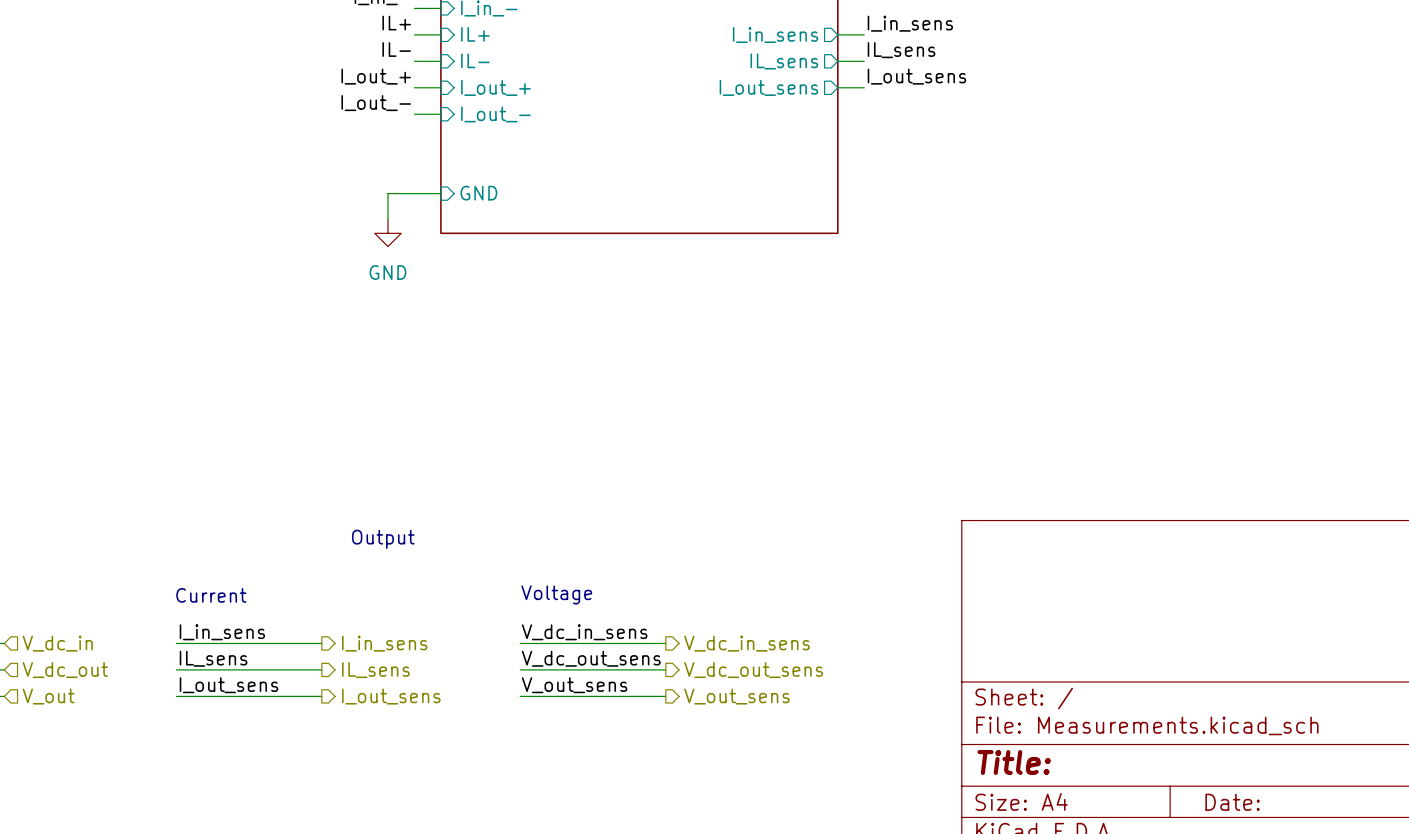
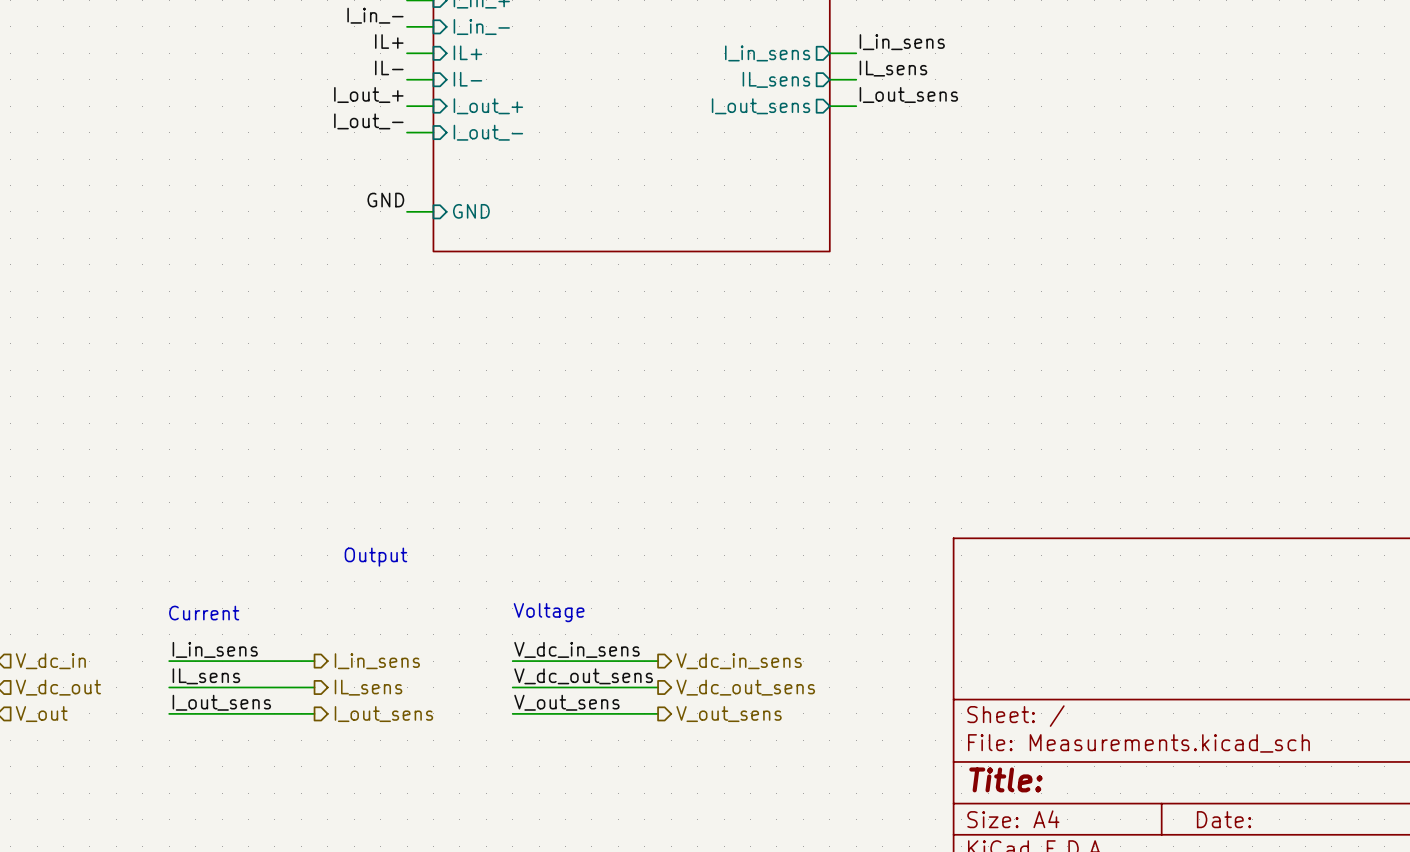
label: none -> GND (385, 200)
wire: (414, 193) (387, 193) (387, 220) -> none
power symbol: GND (387, 233) -> none

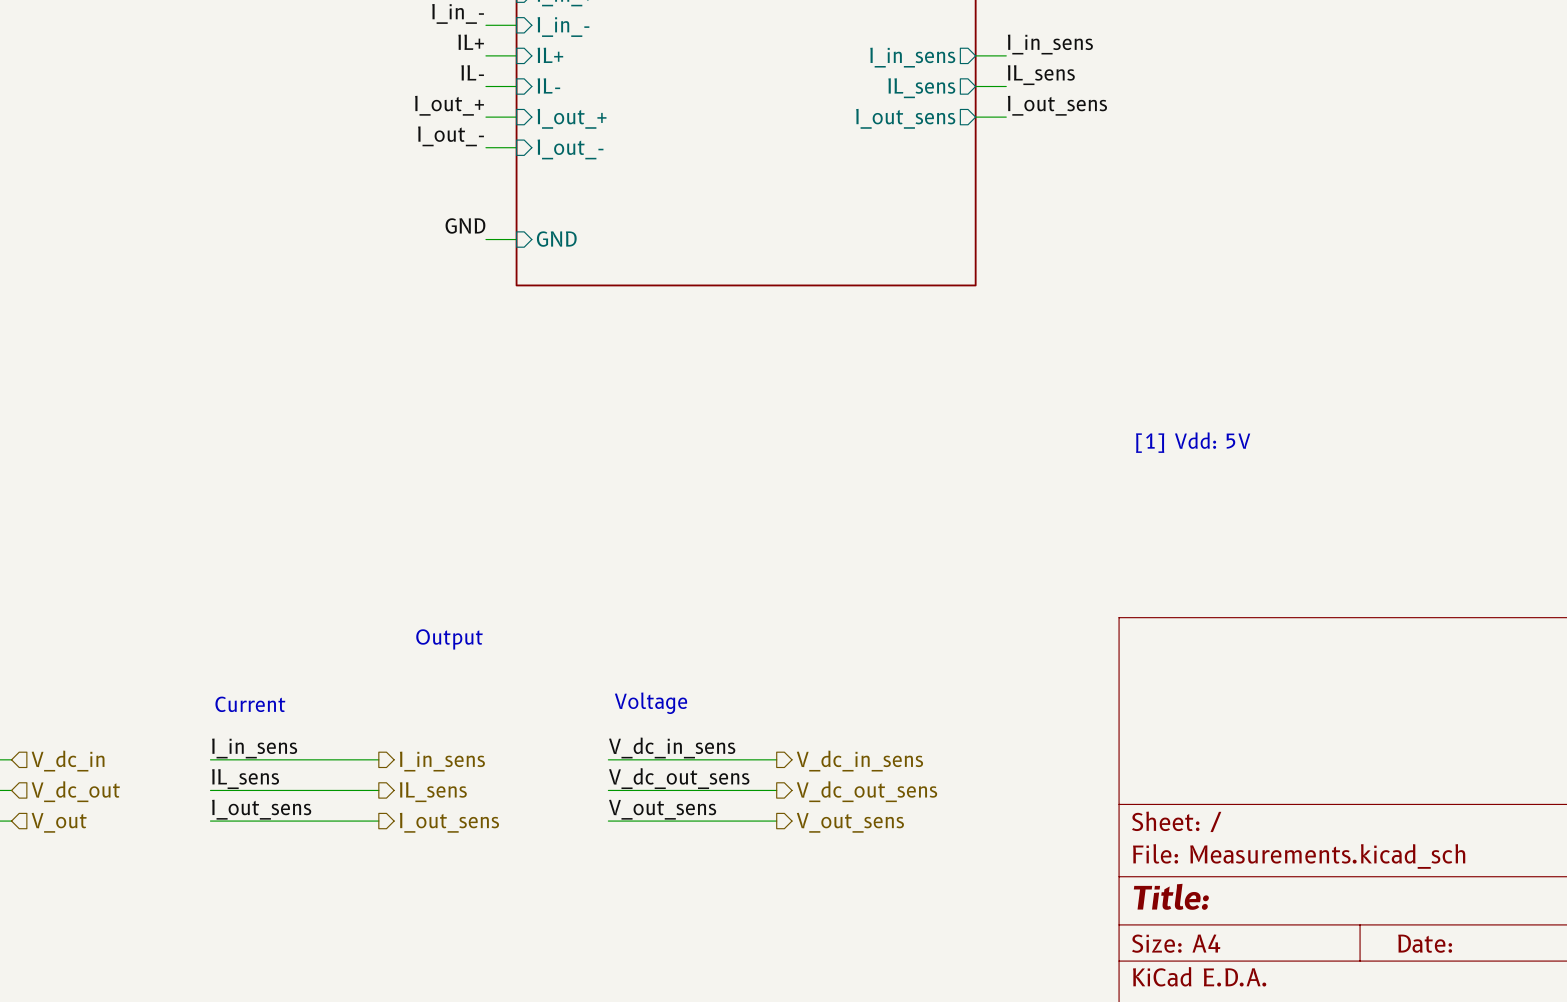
text: none -> [1] Vdd: 5V (1193, 442)

